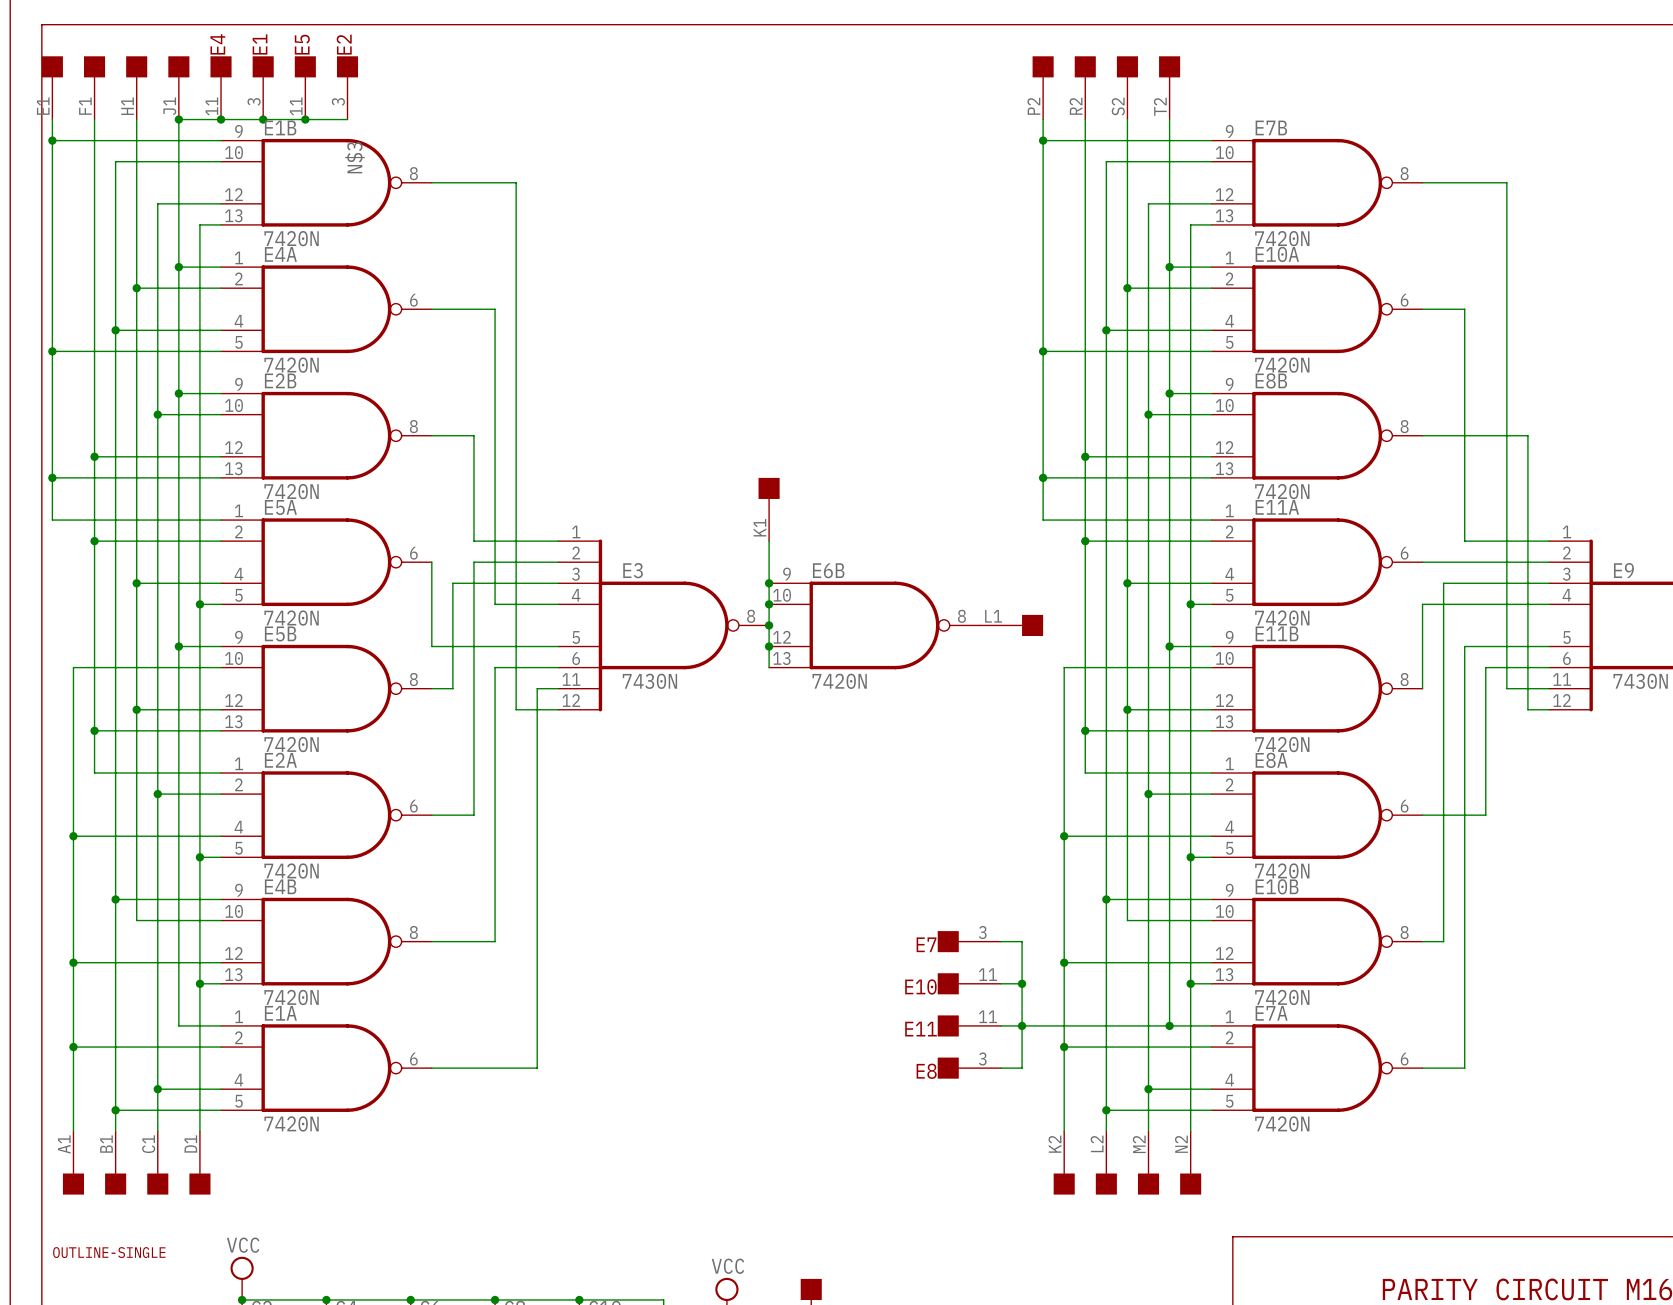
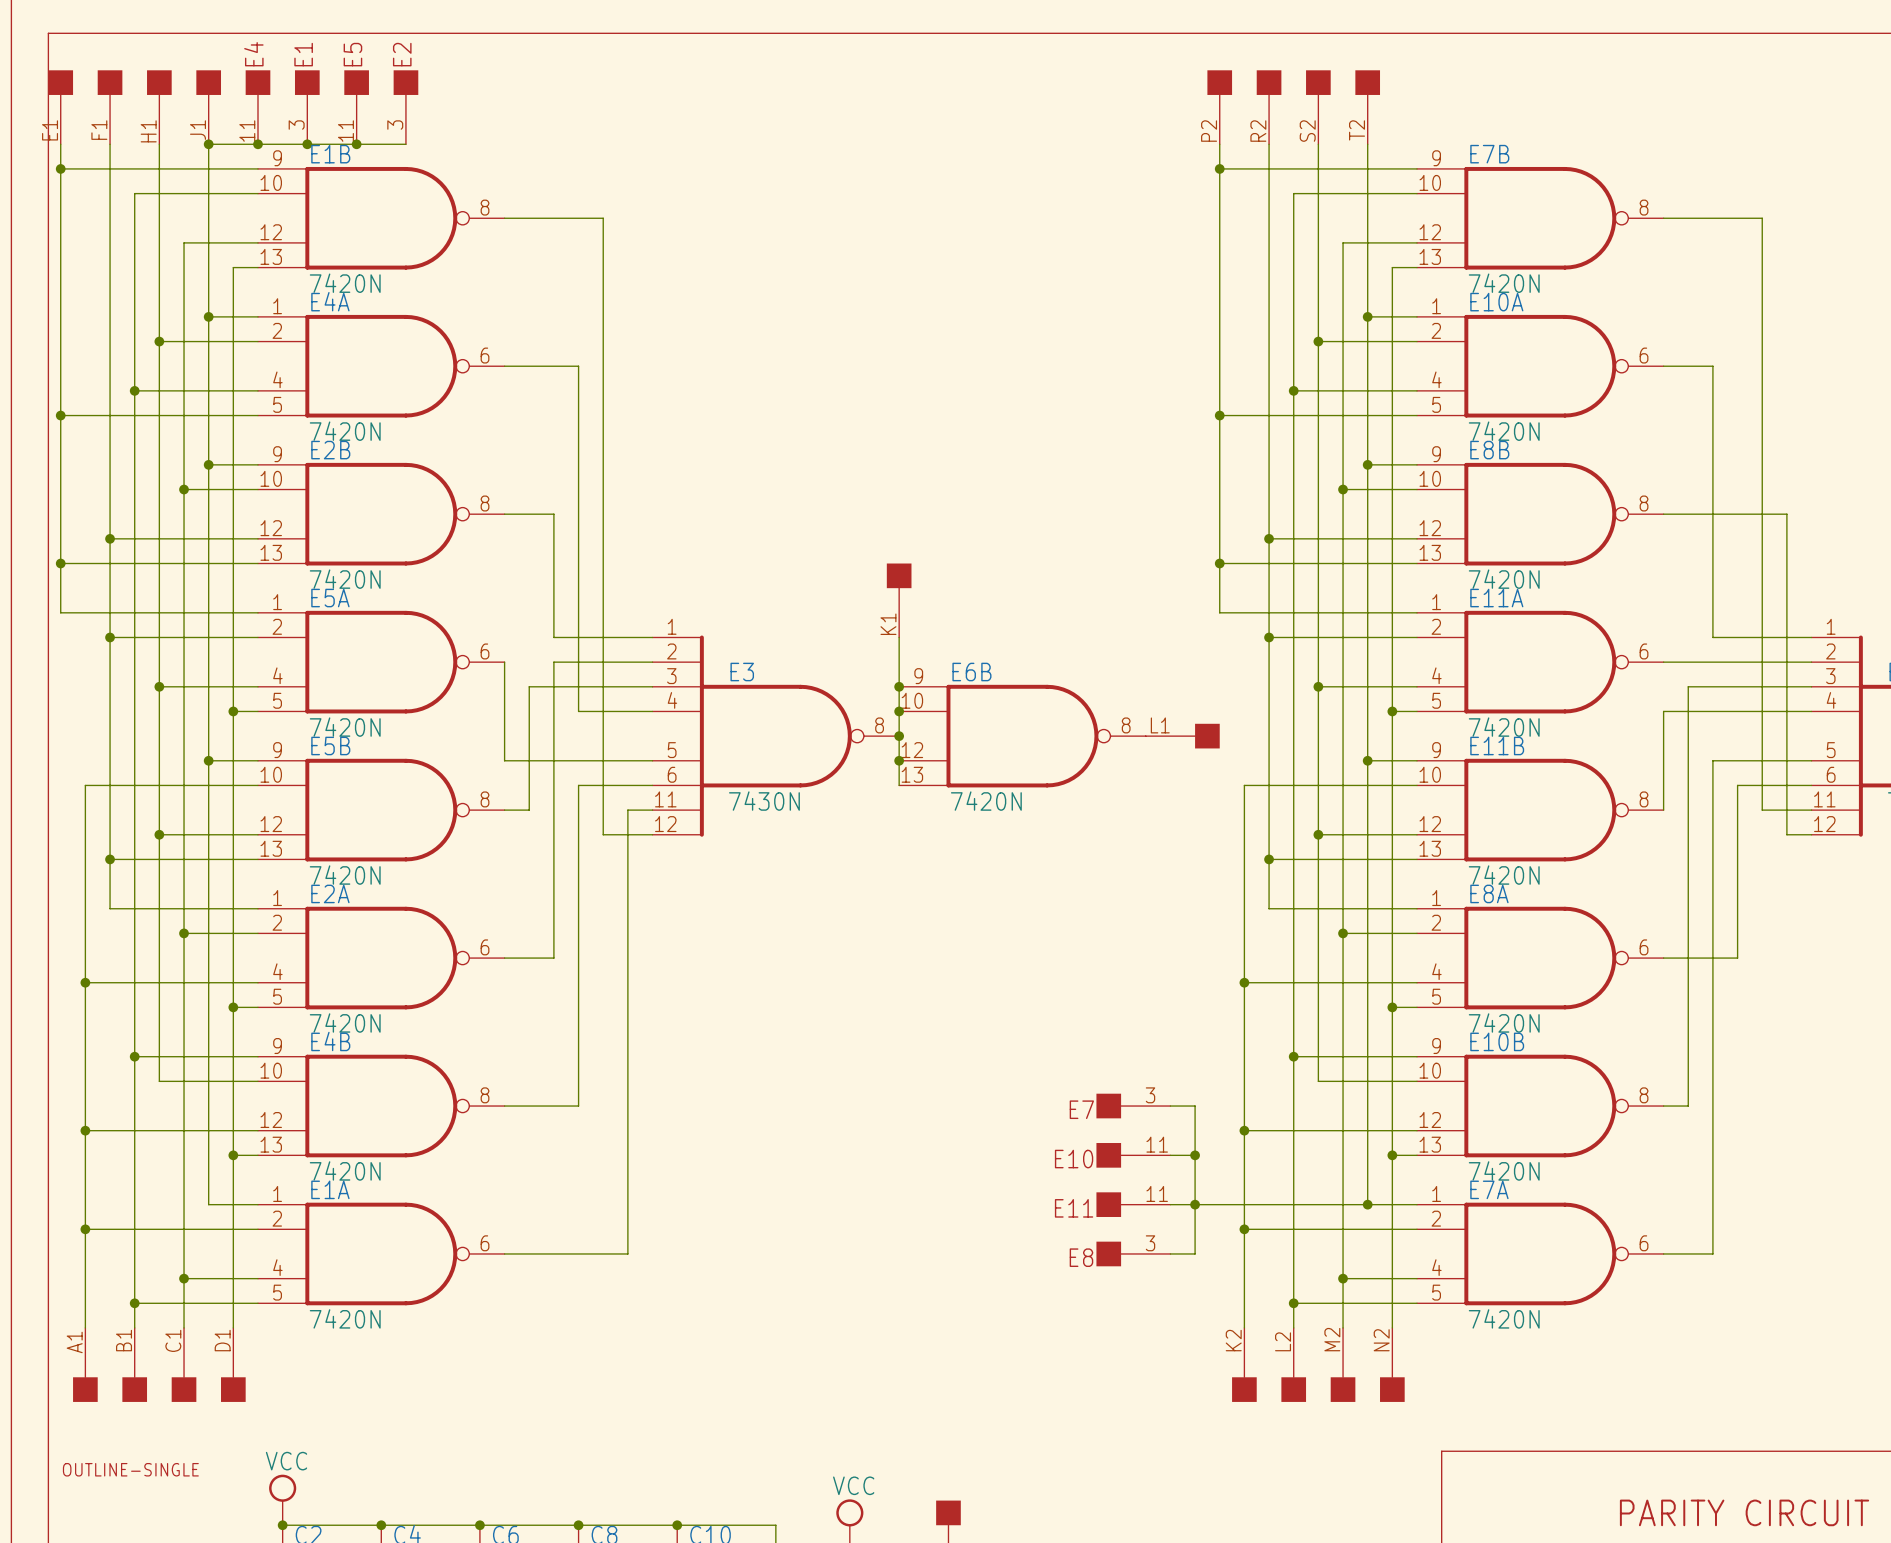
label: N$3 (354, 157) -> none

